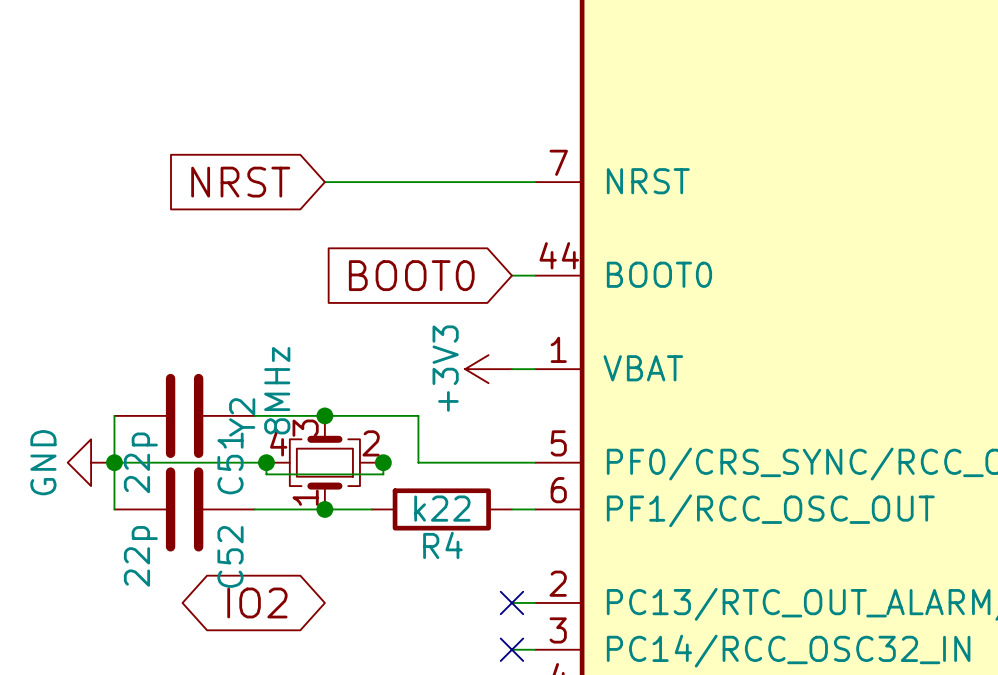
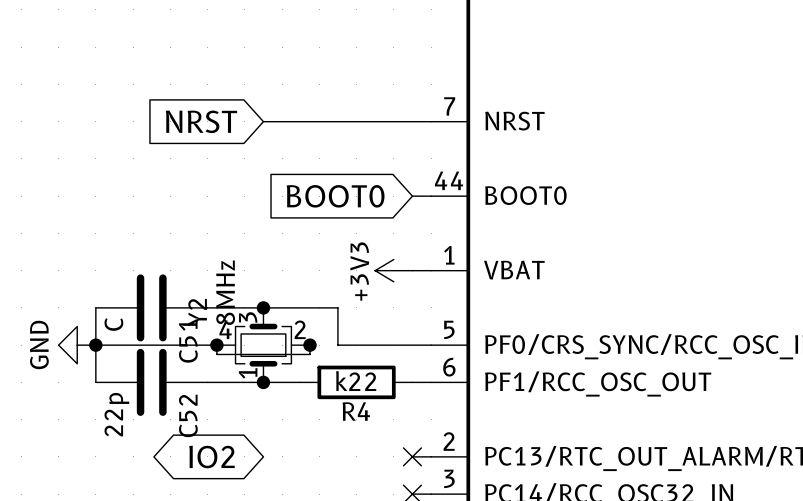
C51 value: 22p (140, 462) -> C (113, 324)

